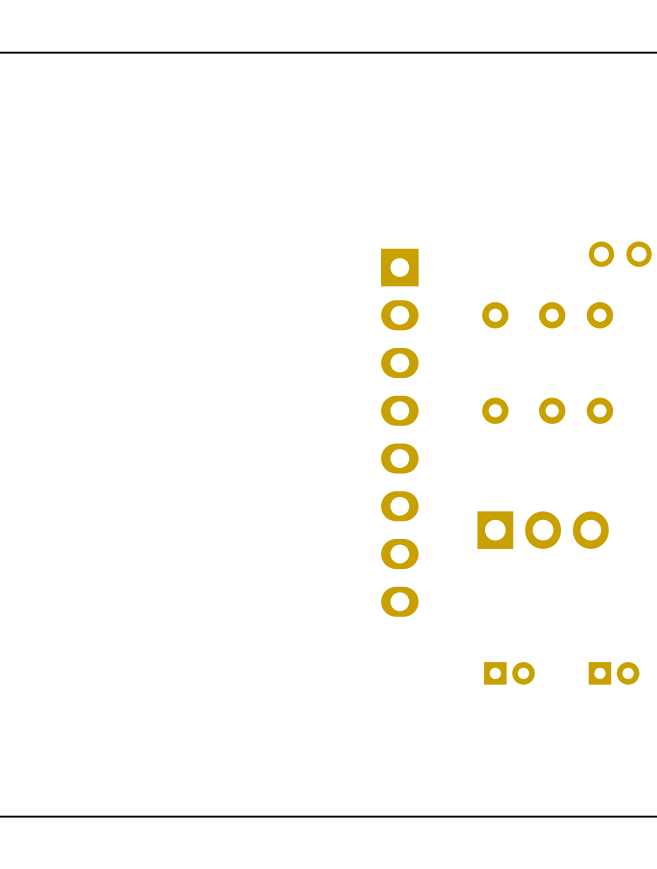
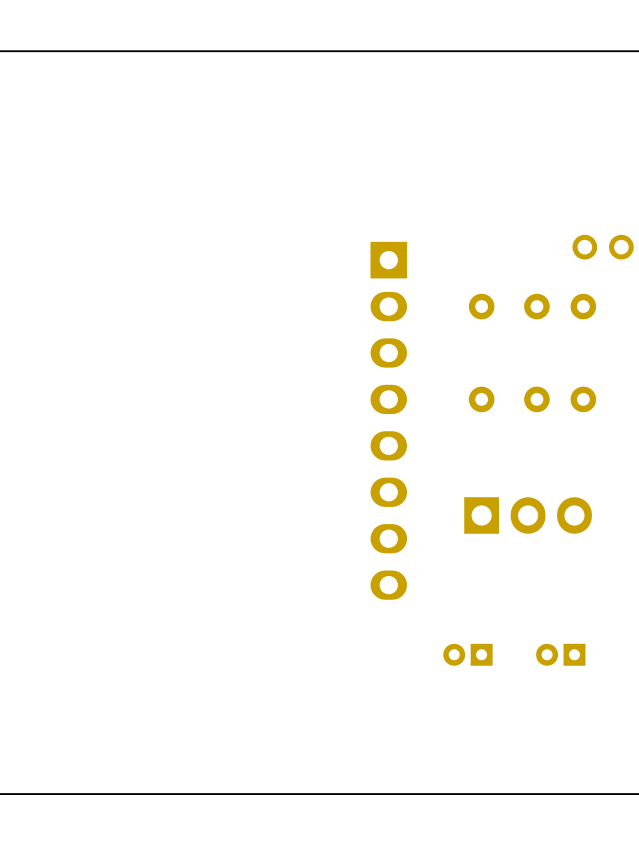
part rotation: 0° (509, 673) -> 180° (467, 654)
part: none -> (560, 654)
part: (614, 673) -> none

